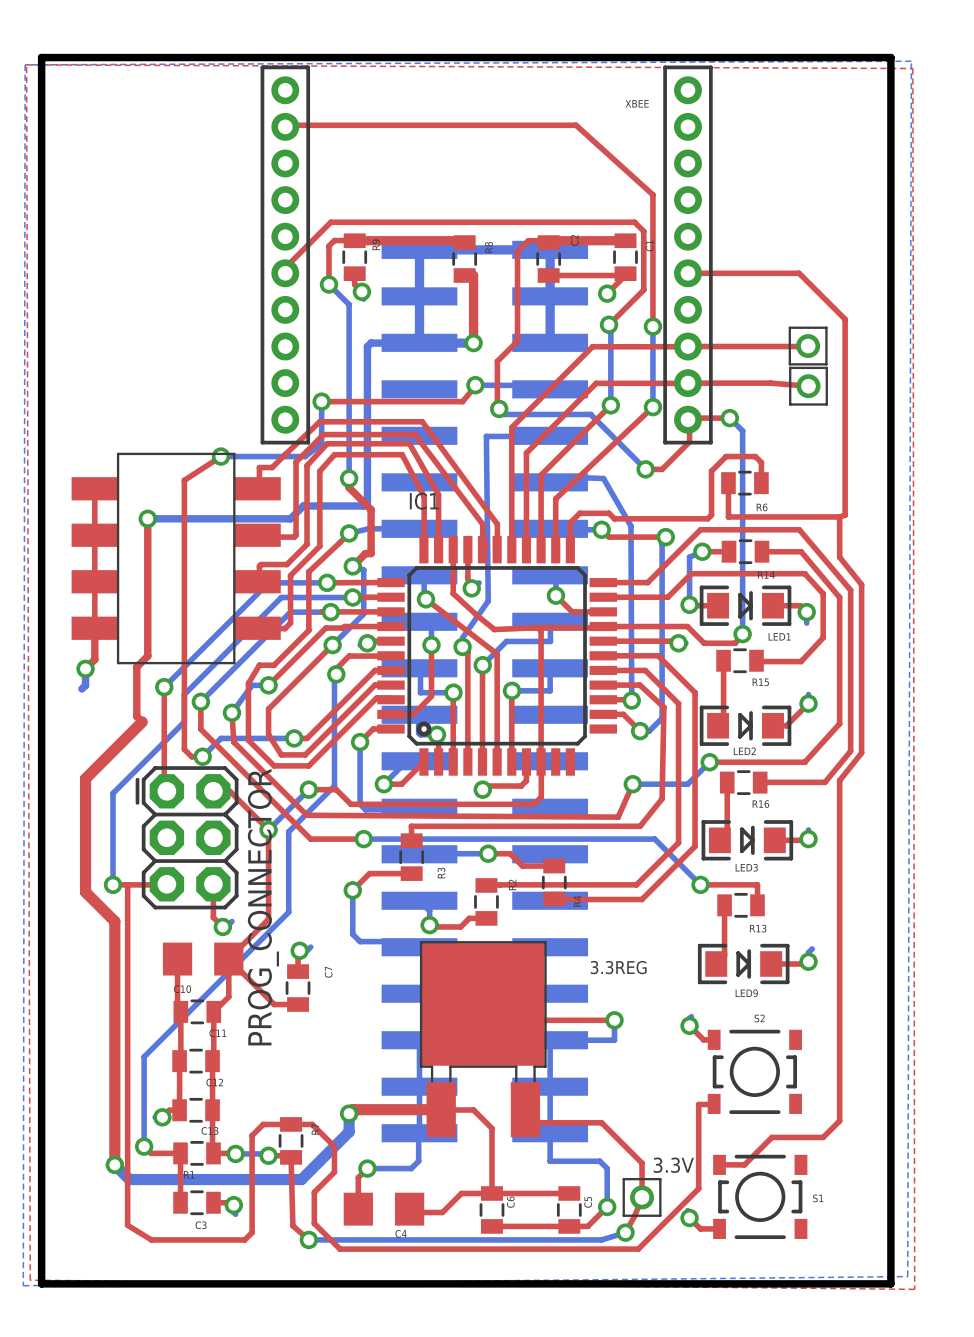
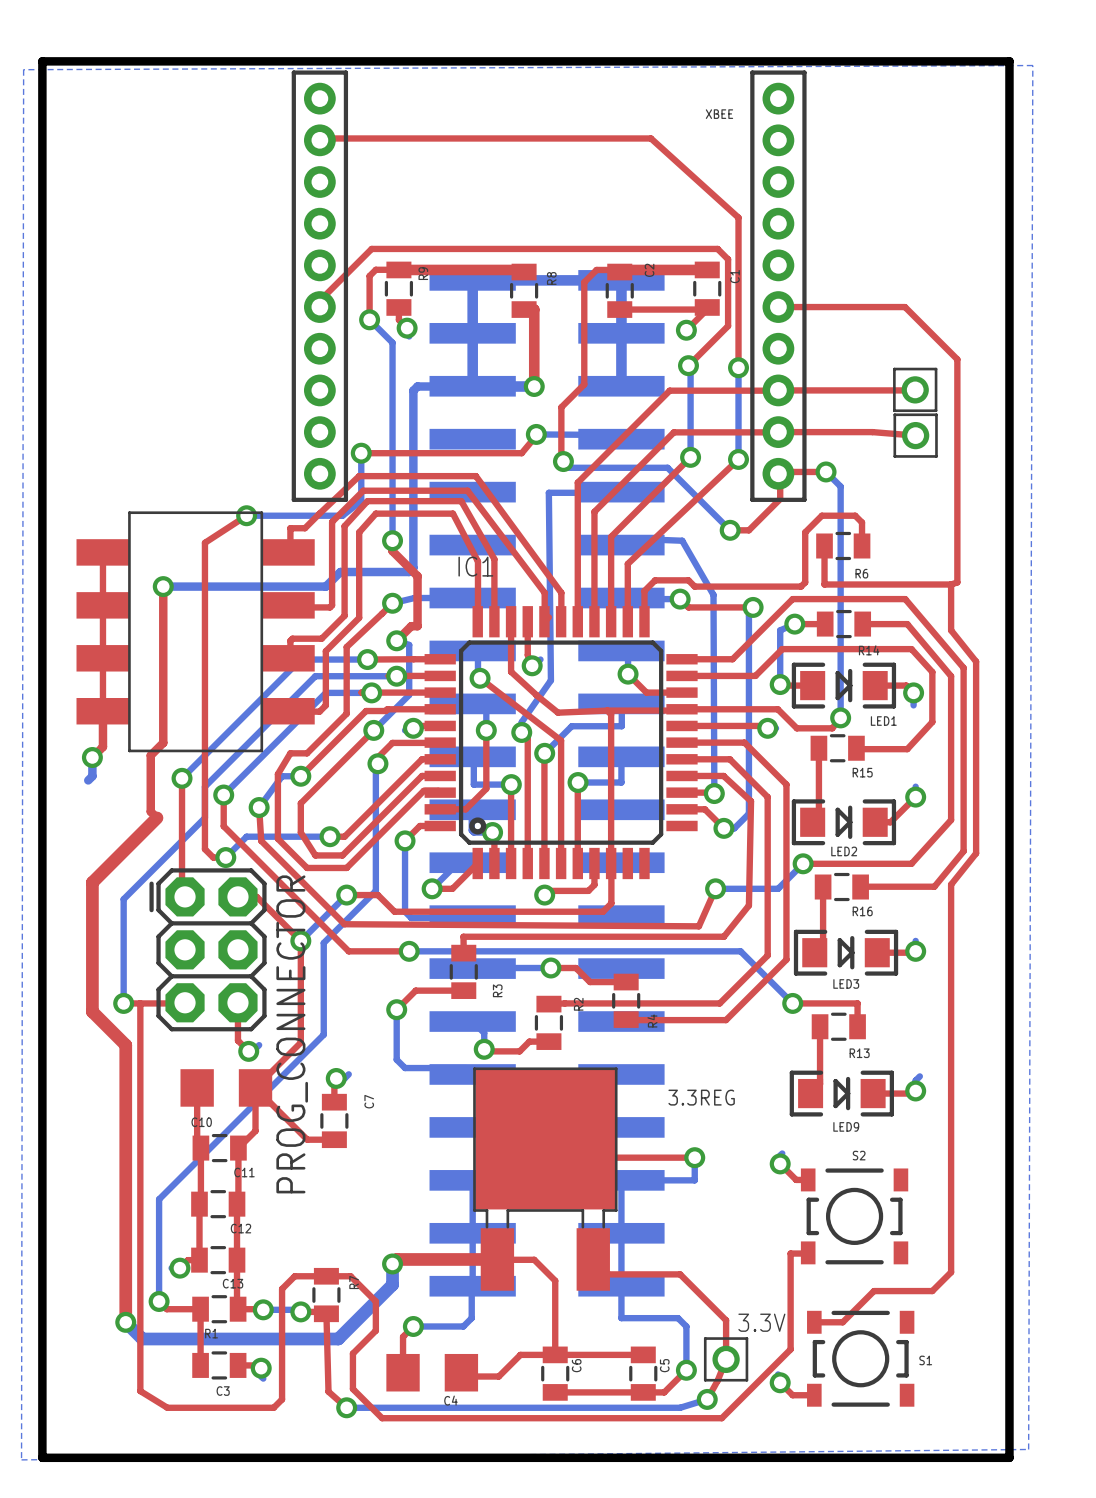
top zone outline: (26, 64) (30, 1280) (914, 1289) (912, 68) (26, 64) -> none

